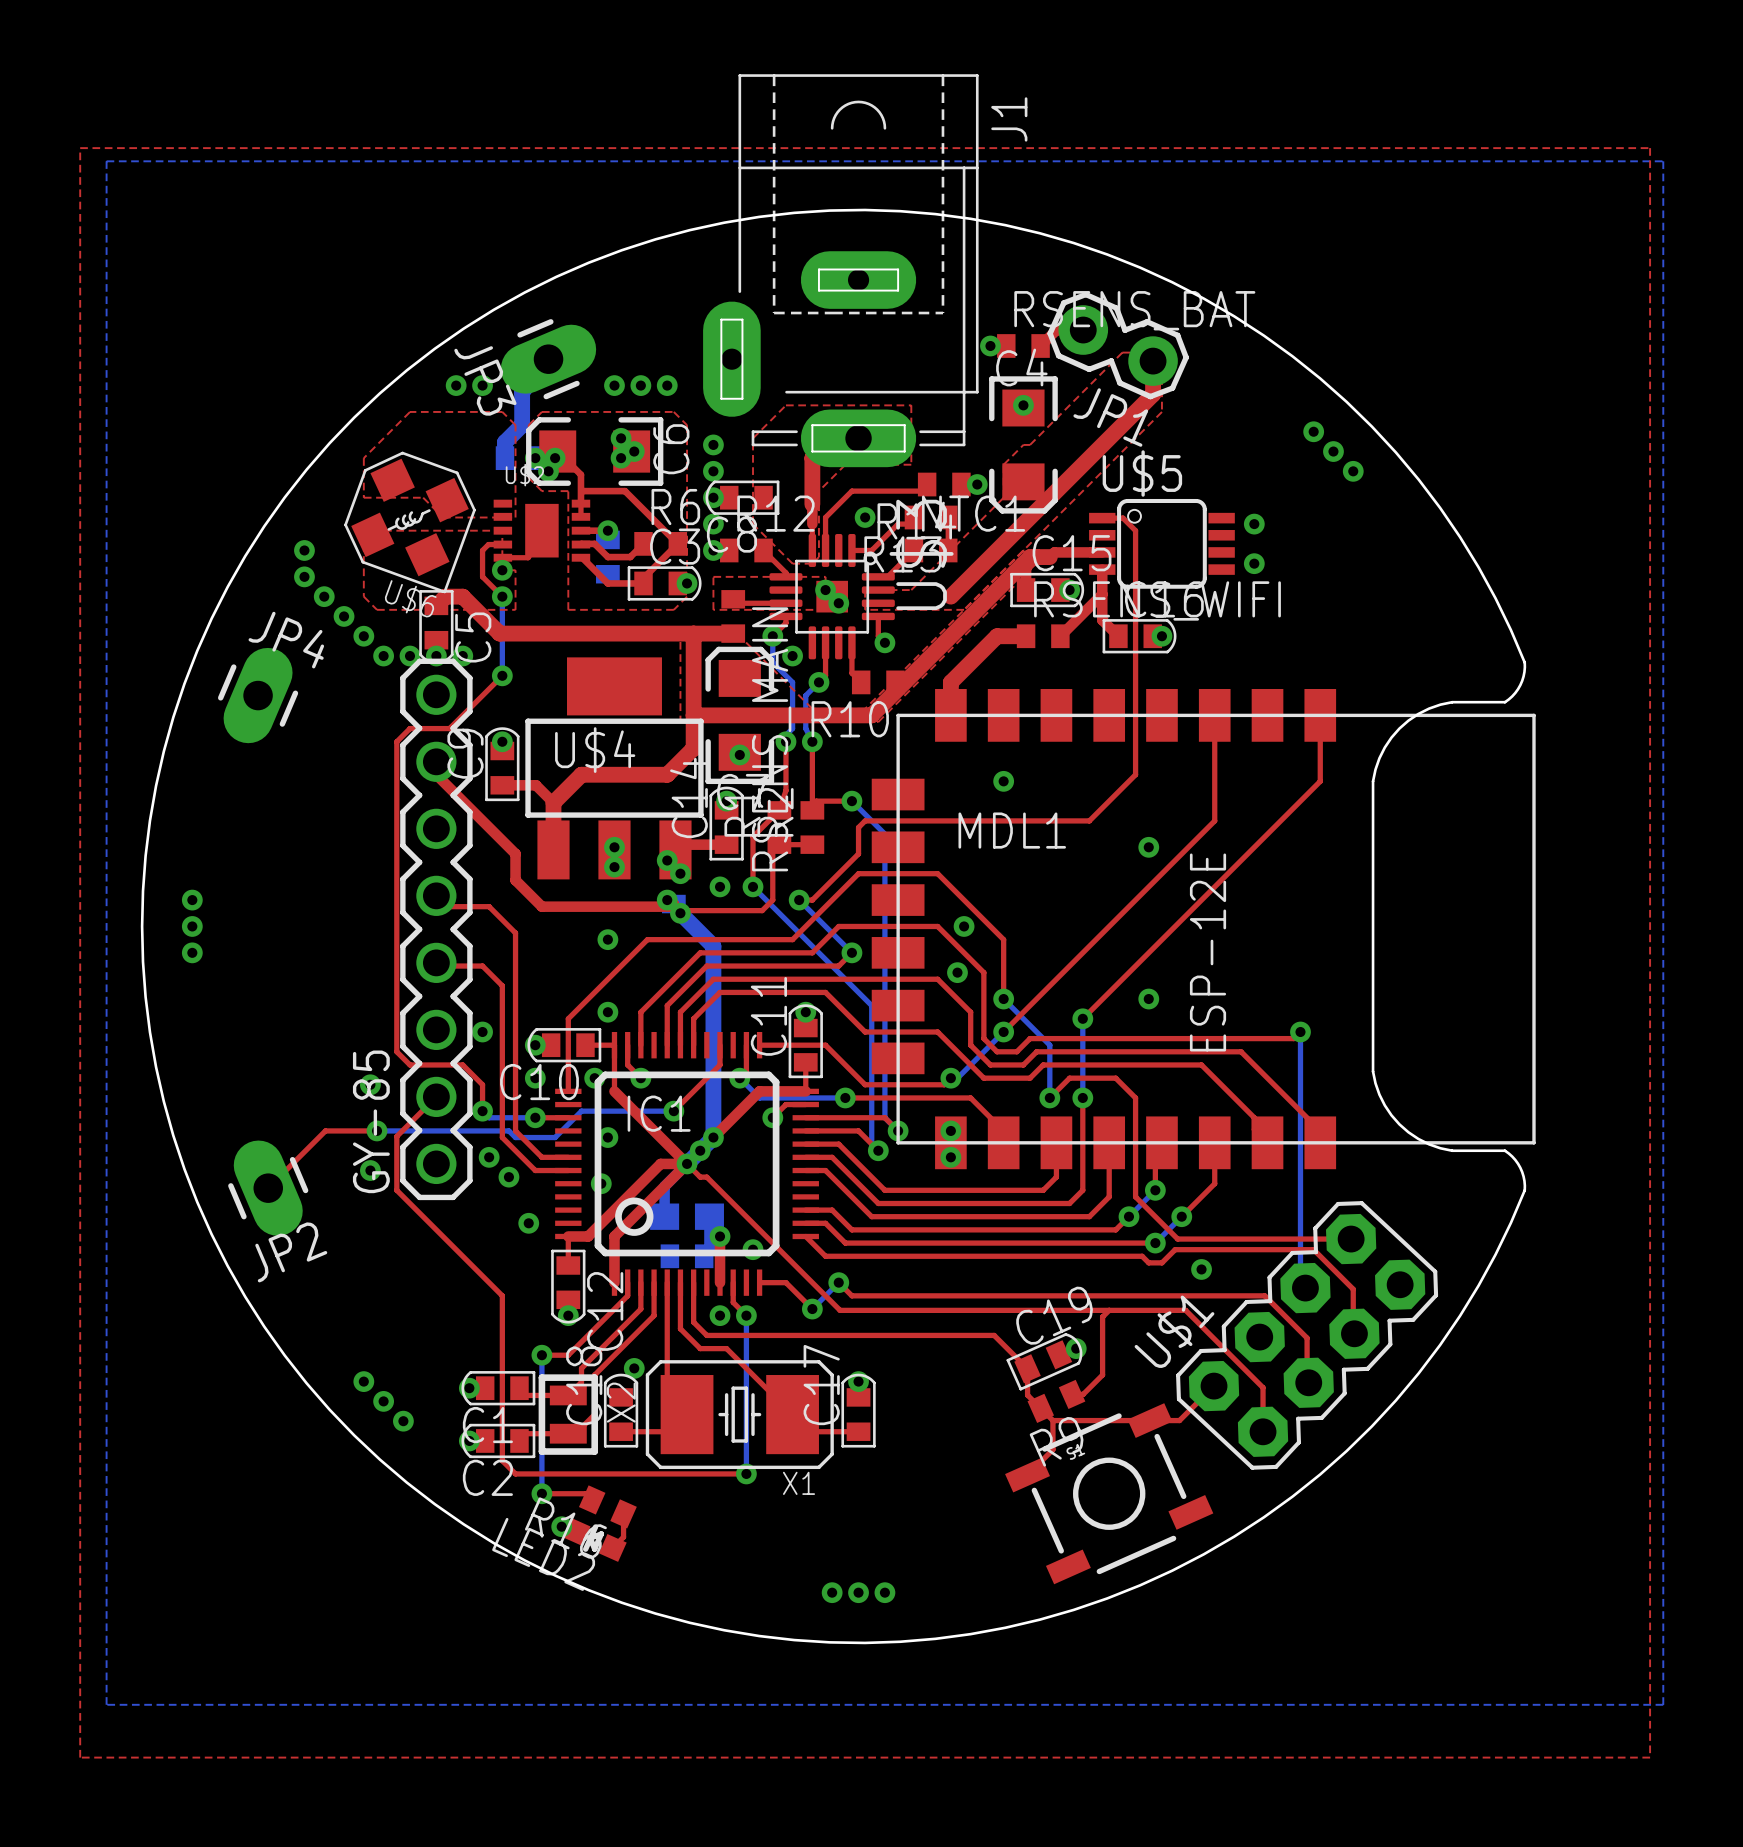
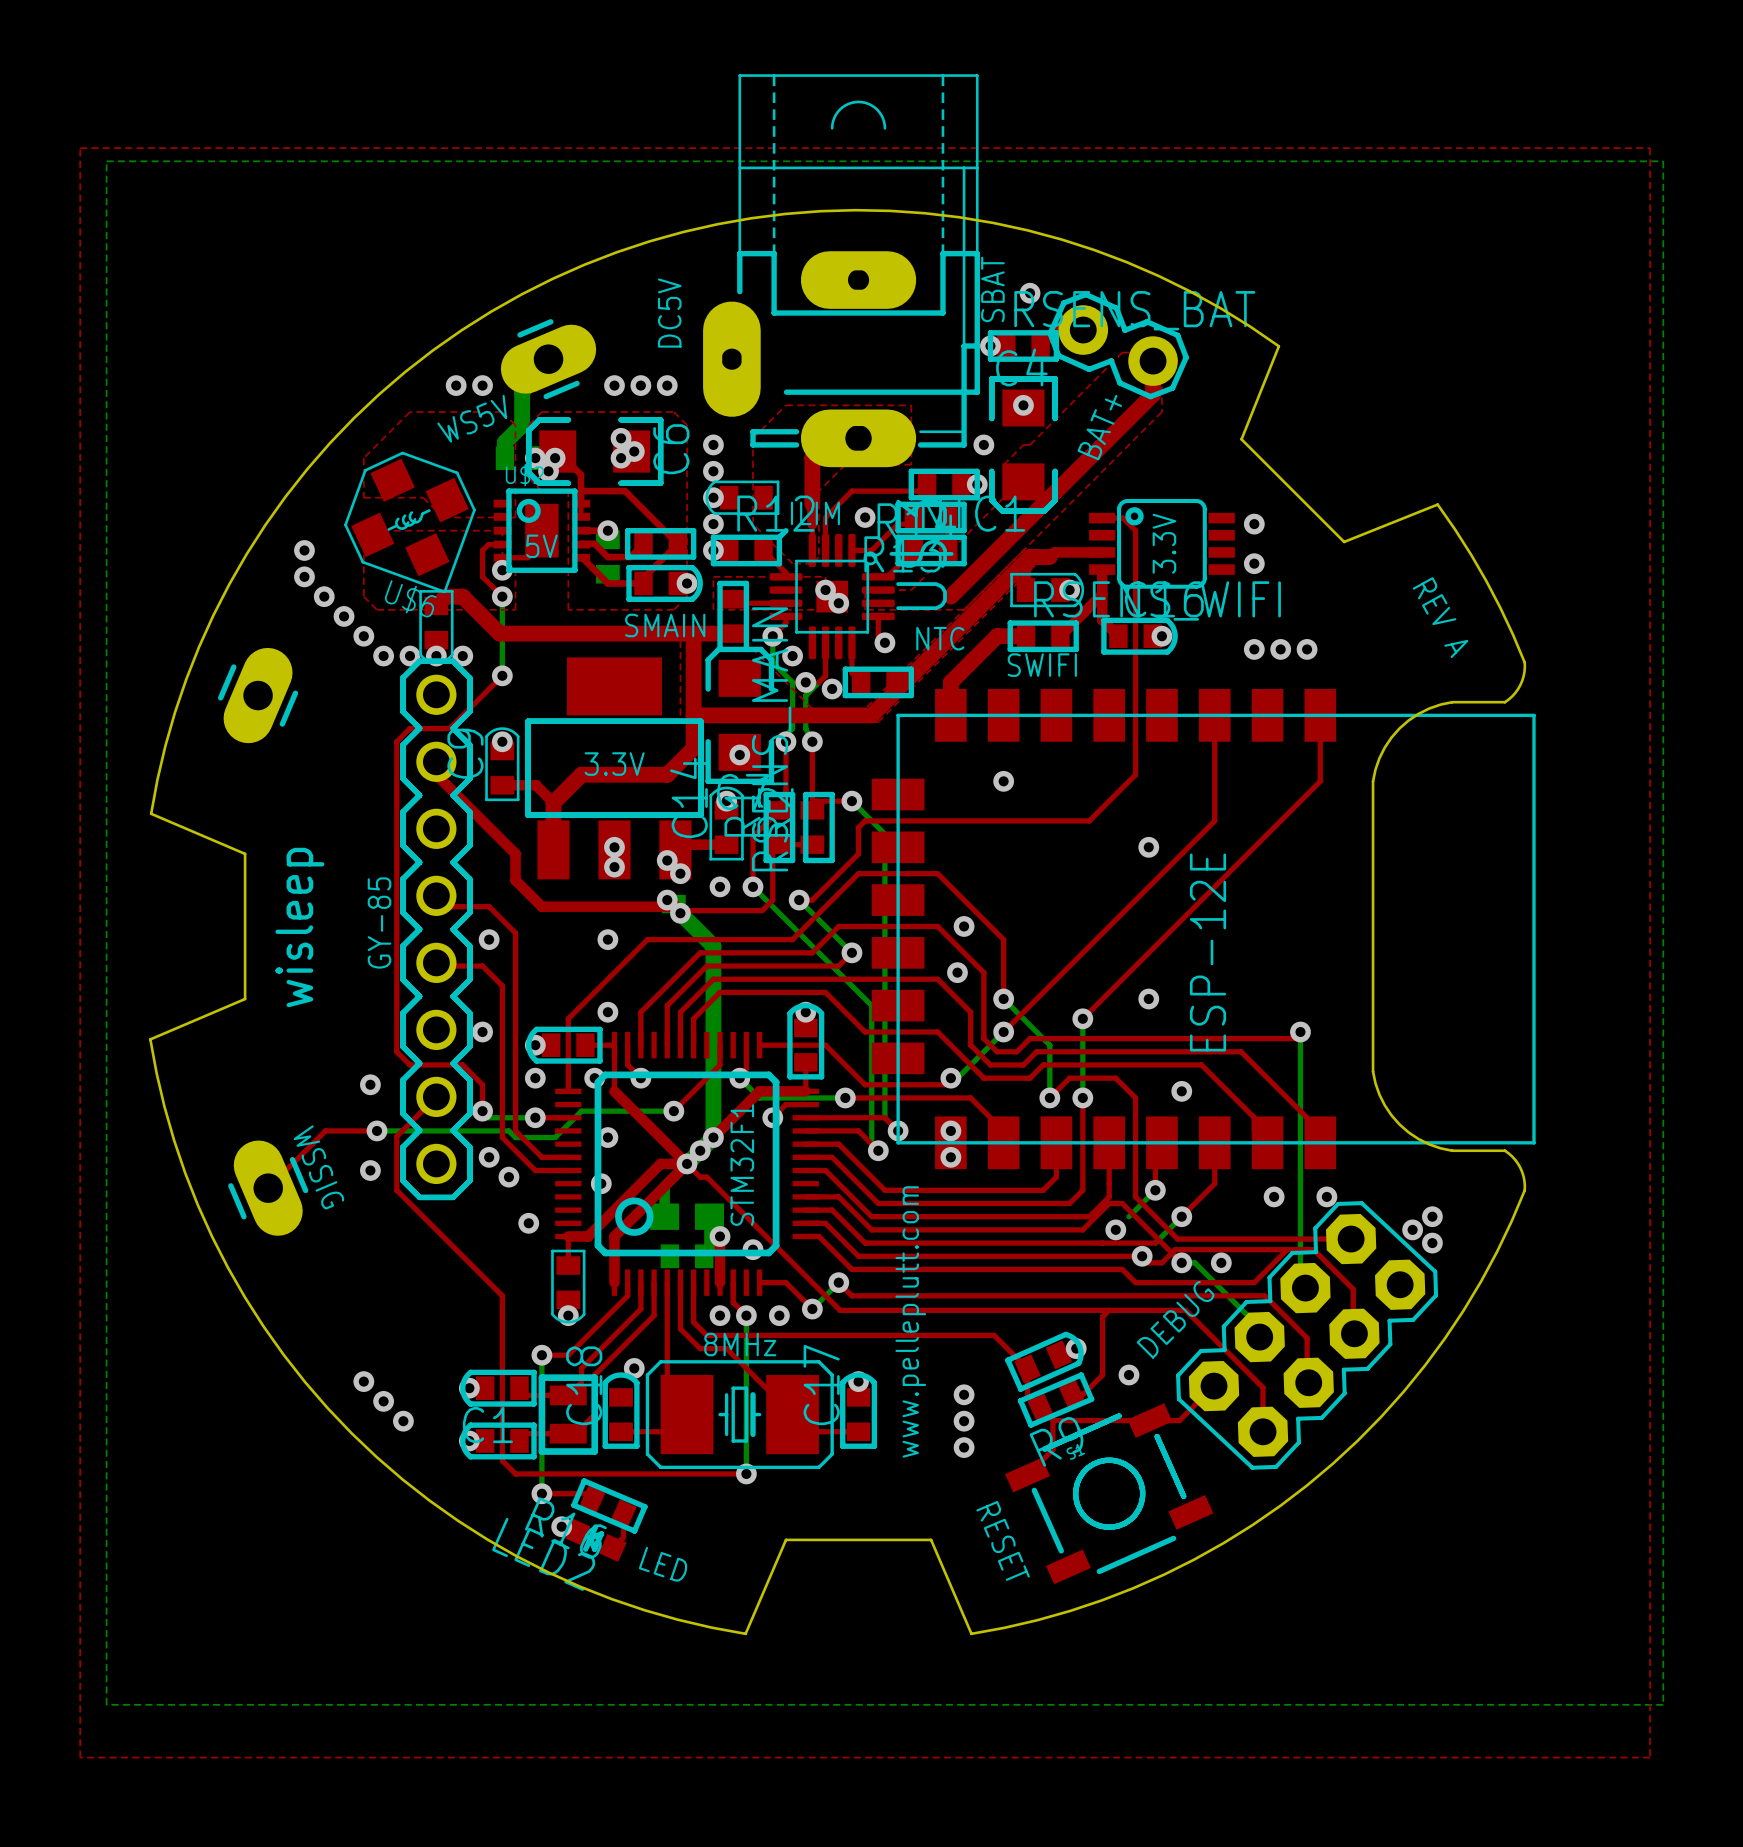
J1 name: J1 (1009, 119) -> none
text: none -> SBAT (992, 289)
line: none -> (739, 291) (739, 253) (774, 253) (774, 313) (942, 313) (942, 253) (977, 253) (977, 392) (786, 392)
via: none -> (1030, 293)
text: none -> DC5V (669, 313)
line: none -> (990, 332) (990, 359) (1056, 359) (1056, 332) (990, 332)
line: none -> (977, 346) (964, 346) (964, 444) (920, 444)
JP3 name: JP3 (485, 380) -> none
JP1 name: JP1 (1110, 417) -> none
text: none -> WS5V (472, 418)
line: none -> (991, 418) (991, 378) (1055, 378) (1055, 418)
line: none -> (568, 419) (539, 419) (528, 430) (528, 472) (539, 483) (568, 483)
line: none -> (621, 419) (660, 419) (660, 483) (621, 483)
text: none -> BAT+ (1099, 427)
line: none -> (796, 431) (753, 431) (753, 444) (796, 444)
via: (1313, 431) -> none
via: none -> (983, 444)
via: (1333, 451) -> none
line: none -> (911, 471) (911, 497) (977, 497) (977, 471) (911, 471)
line: none -> (991, 471) (991, 500) (1002, 510) (1044, 510) (1055, 500) (1055, 471)
via: (1353, 471) -> none
U$5 name: U$5 (1142, 473) -> none
line: none -> (508, 491) (574, 491) (574, 570) (508, 570) (508, 491)
drawing: none -> [516, 498, 541, 523]
line: none -> (898, 504) (898, 530) (964, 530) (964, 504) (898, 504)
R6 name: R6 (675, 507) -> none
drawing: none -> [1125, 507, 1144, 526]
text: none -> ILIM (815, 513)
line: none -> (627, 530) (693, 530) (693, 557) (627, 557) (627, 530)
line: none -> (785, 530) (779, 537)
C8 name: C8 (731, 534) -> none
line: none -> (779, 537) (713, 537) (713, 563) (779, 563) (779, 537)
line: none -> (898, 537) (898, 563) (964, 563) (964, 537) (898, 537)
text: none -> 3.3V (1164, 543)
text: none -> 5V (541, 546)
C3 name: C3 (675, 546) -> none
C15 name: C15 (1072, 553) -> none
line: none -> (628, 567) (692, 567) (699, 576) (699, 590) (692, 599) (628, 599) (628, 567)
text: none -> REV A (1440, 617)
line: none -> (1103, 620) (1167, 620) (1173, 629) (1173, 642) (1167, 652) (1103, 652) (1103, 620)
line: none -> (1010, 623) (1076, 623) (1076, 649) (1010, 649) (1010, 623)
text: none -> SMAIN (665, 625)
C5 name: C5 (473, 637) -> none
text: none -> NTC (940, 638)
JP4 name: JP4 (286, 640) -> none
line: none -> (720, 649) (720, 583) (746, 583) (746, 649)
via: none -> (1254, 649)
via: none -> (1280, 649)
via: none -> (1307, 649)
line: none -> (419, 661) (402, 678) (402, 711) (419, 728) (402, 745) (402, 778) (419, 795) (402, 812) (402, 845) (419, 862) (402, 879) (402, 912) (419, 929) (402, 946) (402, 979) (419, 996) (402, 1013) (402, 1046) (419, 1063) (402, 1080) (402, 1113) (419, 1130) (402, 1147) (402, 1180) (419, 1197) (453, 1197) (469, 1180) (469, 1147) (453, 1130) (469, 1113) (469, 1080) (453, 1063) (469, 1046) (469, 1013) (453, 996) (469, 979) (469, 946) (453, 929) (469, 912) (469, 879) (453, 862) (469, 845) (469, 812) (453, 795) (469, 778) (469, 745) (453, 728) (469, 711) (469, 678) (453, 661) (419, 661)
board edge: (1524, 662) (1495, 598) (1460, 537) (1418, 479) (1396, 452) (1346, 401) (1292, 356) (1234, 316) (1203, 298) (1172, 282) (1107, 254) (1039, 233) (970, 218) (900, 211) (829, 210) (794, 212) (724, 222) (689, 230) (621, 250) (556, 276) (493, 309) (434, 348) (379, 393) (354, 417) (306, 469) (284, 497) (245, 556) (211, 618) (184, 683) (163, 751) (149, 820) (145, 855) (142, 926) (145, 997) (149, 1032) (163, 1101) (184, 1169) (211, 1234) (245, 1296) (284, 1355) (306, 1383) (354, 1435) (379, 1459) (434, 1504) (493, 1543) (556, 1576) (621, 1602) (689, 1622) (724, 1630) (794, 1640) (829, 1642) (900, 1641) (970, 1634) (1039, 1619) (1107, 1598) (1172, 1570) (1203, 1554) (1234, 1536) (1292, 1496) (1346, 1451) (1396, 1400) (1418, 1373) (1460, 1315) (1495, 1254) (1524, 1190) -> (1524, 662) (1486, 580) (1437, 504) (1344, 541) (1241, 439) (1278, 346) (1250, 326) (1190, 291) (1127, 262) (1061, 239) (993, 223) (924, 213) (855, 210) (785, 213) (751, 218) (683, 231) (616, 252) (552, 278) (491, 311) (461, 330) (405, 371) (354, 418) (307, 469) (265, 524) (229, 584) (199, 647) (175, 712) (165, 745) (151, 813) (245, 853) (245, 999) (150, 1039) (164, 1107) (185, 1173) (197, 1205) (227, 1267) (245, 1297) (283, 1354) (327, 1408) (351, 1433) (402, 1479) (429, 1500) (487, 1539) (517, 1556) (579, 1586) (644, 1610) (677, 1619) (745, 1633) (785, 1539) (931, 1539) (971, 1633) (1037, 1620) (1101, 1600) (1164, 1574) (1223, 1543) (1280, 1505) (1306, 1485) (1357, 1440) (1403, 1391) (1444, 1338) (1481, 1281) (1511, 1221) (1524, 1190)
text: none -> SWIFI (1042, 665)
line: none -> (845, 669) (911, 669) (911, 695) (845, 695) (845, 669)
via: none -> (805, 682)
via: (818, 682) -> none
via: none -> (832, 689)
R10 name: R10 (850, 719) -> none
line: none -> (528, 721) (528, 815) (700, 815) (700, 721) (528, 721)
U$4 name: U$4 (595, 750) -> none
text: none -> 3.3V (614, 764)
line: none -> (766, 794) (766, 860) (792, 860) (792, 794) (766, 794)
line: none -> (805, 794) (832, 794) (832, 860) (805, 860) (805, 794)
MDL1 name: MDL1 (1012, 830) -> none
via: (192, 900) -> none
text: none -> GY-85 (379, 922)
via: (192, 926) -> none
text: none -> wisleep (299, 927)
via: none -> (489, 939)
via: (192, 952) -> none
line: none -> (789, 1013) (789, 1076) (821, 1076) (821, 1013) (814, 1007) (805, 1005) (796, 1007) (789, 1013)
C11 name: C11 (768, 1016) -> none
line: none -> (536, 1029) (599, 1029) (599, 1061) (536, 1061) (530, 1054) (528, 1045) (530, 1036) (536, 1029)
C10 name: C10 (539, 1082) -> none
via: none -> (1181, 1091)
IC1 name: IC1 (659, 1113) -> none
GY-85 name: GY-85 (371, 1121) -> none
text: none -> STM32F1 (742, 1165)
text: none -> WSSIG (318, 1167)
top track: none -> (805, 1196) (838, 1196) (871, 1229)
via: none -> (1274, 1196)
via: none -> (1326, 1196)
top track: (1128, 1216) (1115, 1229) (1082, 1229) -> (1181, 1262) (1122, 1203) (1109, 1203) (1082, 1229)
via position: (1128, 1216) -> (1115, 1229)
via: none -> (1432, 1216)
top track: (851, 1229) (871, 1229) -> (851, 1229) (865, 1243)
via: none -> (1412, 1229)
top track: (805, 1236) (825, 1256) (858, 1256) -> (805, 1236) (818, 1236) (851, 1269) (1122, 1269) (1135, 1282) (1254, 1282) (1287, 1249)
top track: (845, 1243) (865, 1243) -> (845, 1243) (858, 1256)
via position: (1155, 1243) -> (1142, 1256)
via: none -> (1432, 1243)
JP2 name: JP2 (291, 1252) -> none
bottom track: none -> (1181, 1262) (1194, 1262) (1259, 1327) (1259, 1337)
via: none -> (1181, 1262)
via: none -> (1221, 1262)
via: (1201, 1269) -> none
C12 name: C12 (605, 1311) -> none
via: none -> (779, 1315)
C19 name: C19 (1054, 1315) -> none
text: none -> DEBUG (1175, 1319)
text: none -> www.pelleplutt.com (910, 1321)
U$1 name: U$1 (1174, 1331) -> none
line: none -> (1065, 1334) (1007, 1360) (1020, 1389) (1078, 1363) (1081, 1354) (1079, 1345) (1073, 1338) (1065, 1334)
text: none -> 8MHz (740, 1344)
line: none -> (470, 1372) (534, 1372) (534, 1404) (470, 1404) (464, 1397) (462, 1388) (464, 1379) (470, 1372)
line: none -> (1081, 1375) (1020, 1400) (1030, 1425) (1091, 1399) (1081, 1375)
via: none -> (1128, 1375)
line: none -> (605, 1382) (605, 1446) (636, 1446) (636, 1382) (629, 1377) (621, 1375) (612, 1377) (605, 1382)
line: none -> (842, 1382) (842, 1446) (874, 1446) (874, 1382) (867, 1377) (858, 1375) (849, 1377) (842, 1382)
line: none -> (753, 1394) (753, 1434)
via: none -> (964, 1394)
X2 name: X2 (621, 1402) -> none
line: none -> (1119, 1415) (1044, 1449)
via: none -> (964, 1421)
line: none -> (470, 1425) (534, 1425) (534, 1456) (470, 1456) (464, 1449) (462, 1440) (464, 1432) (470, 1425)
line: none -> (1157, 1436) (1183, 1496)
via: none -> (964, 1447)
drawing: none -> [1073, 1457, 1146, 1530]
C2 name: C2 (487, 1477) -> none
line: none -> (584, 1480) (644, 1506) (634, 1531) (573, 1505) (584, 1480)
X1 name: X1 (798, 1483) -> none
text: none -> RESET (1003, 1540)
text: none -> LED (663, 1564)
via: (832, 1592) -> none
via: (858, 1592) -> none
via: (884, 1592) -> none

